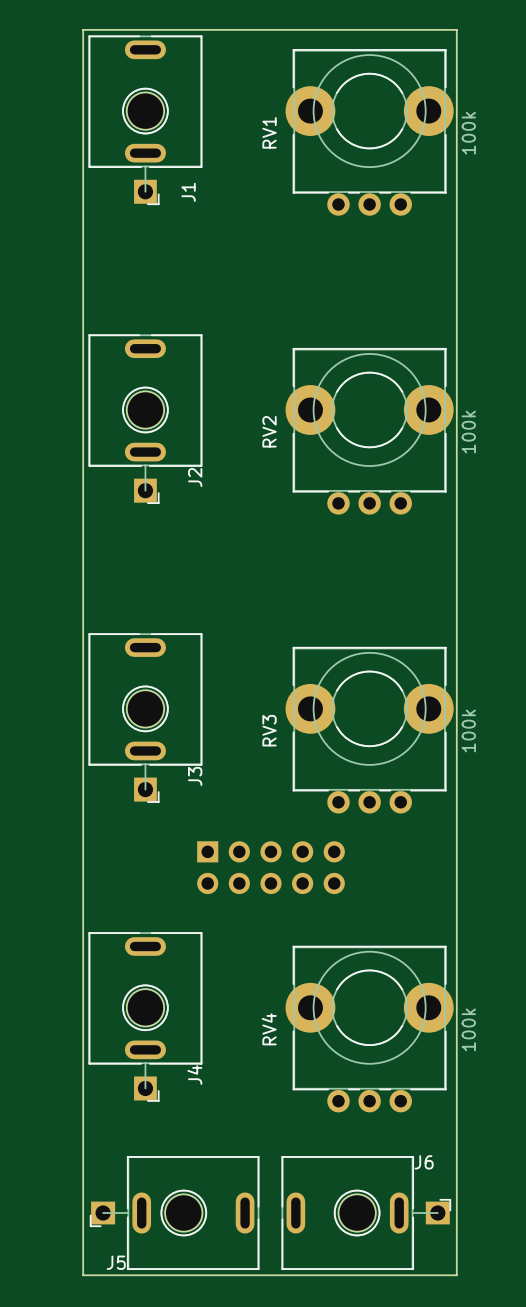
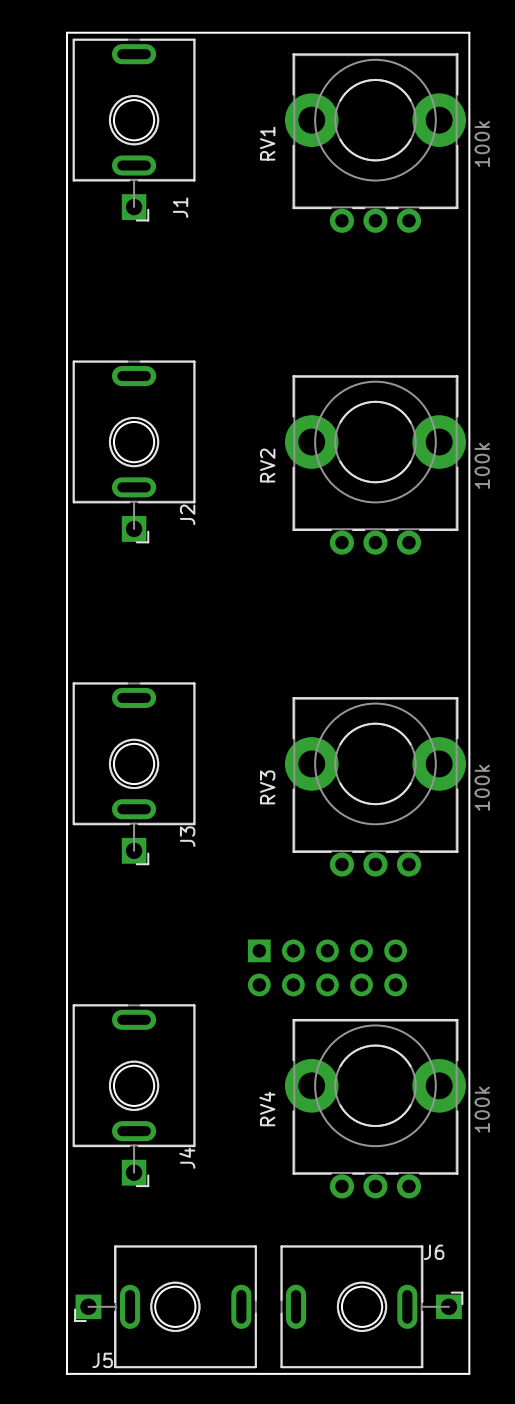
part position: (270, 867) -> (327, 967)

